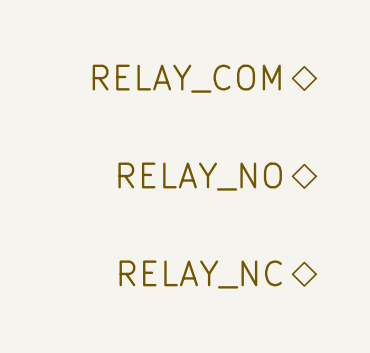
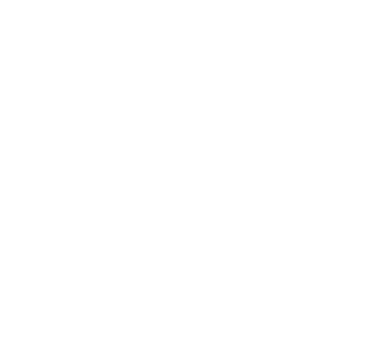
hierarchical label: RELAY_COM (186, 78) -> none
hierarchical label: RELAY_NO (200, 176) -> none
hierarchical label: RELAY_NC (200, 274) -> none

